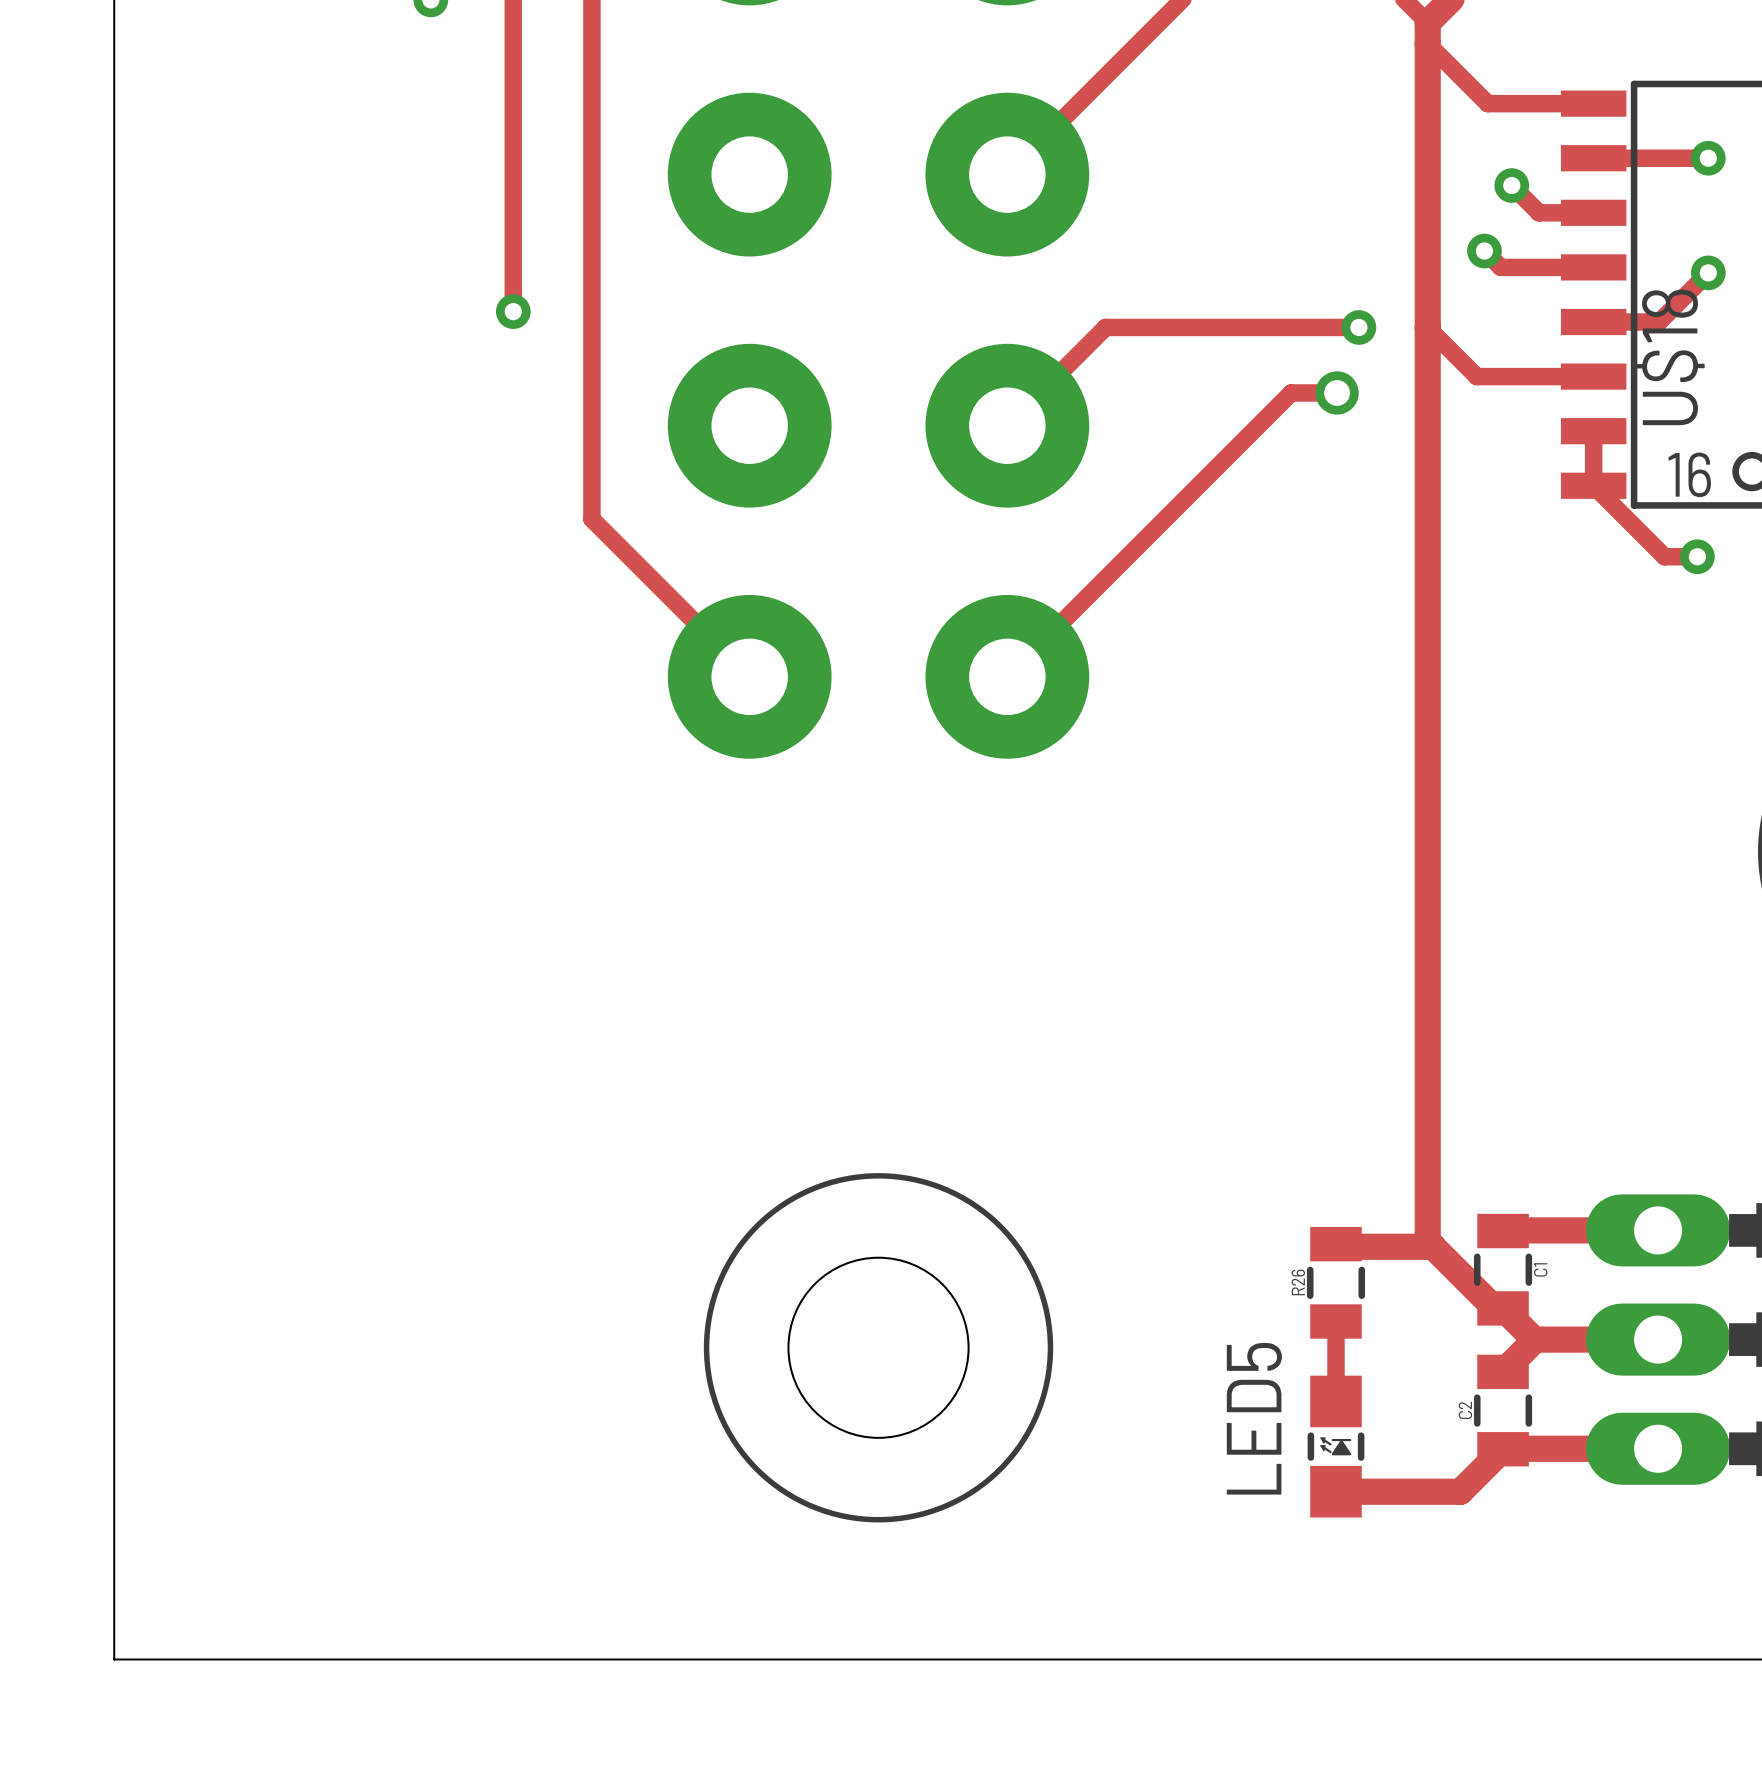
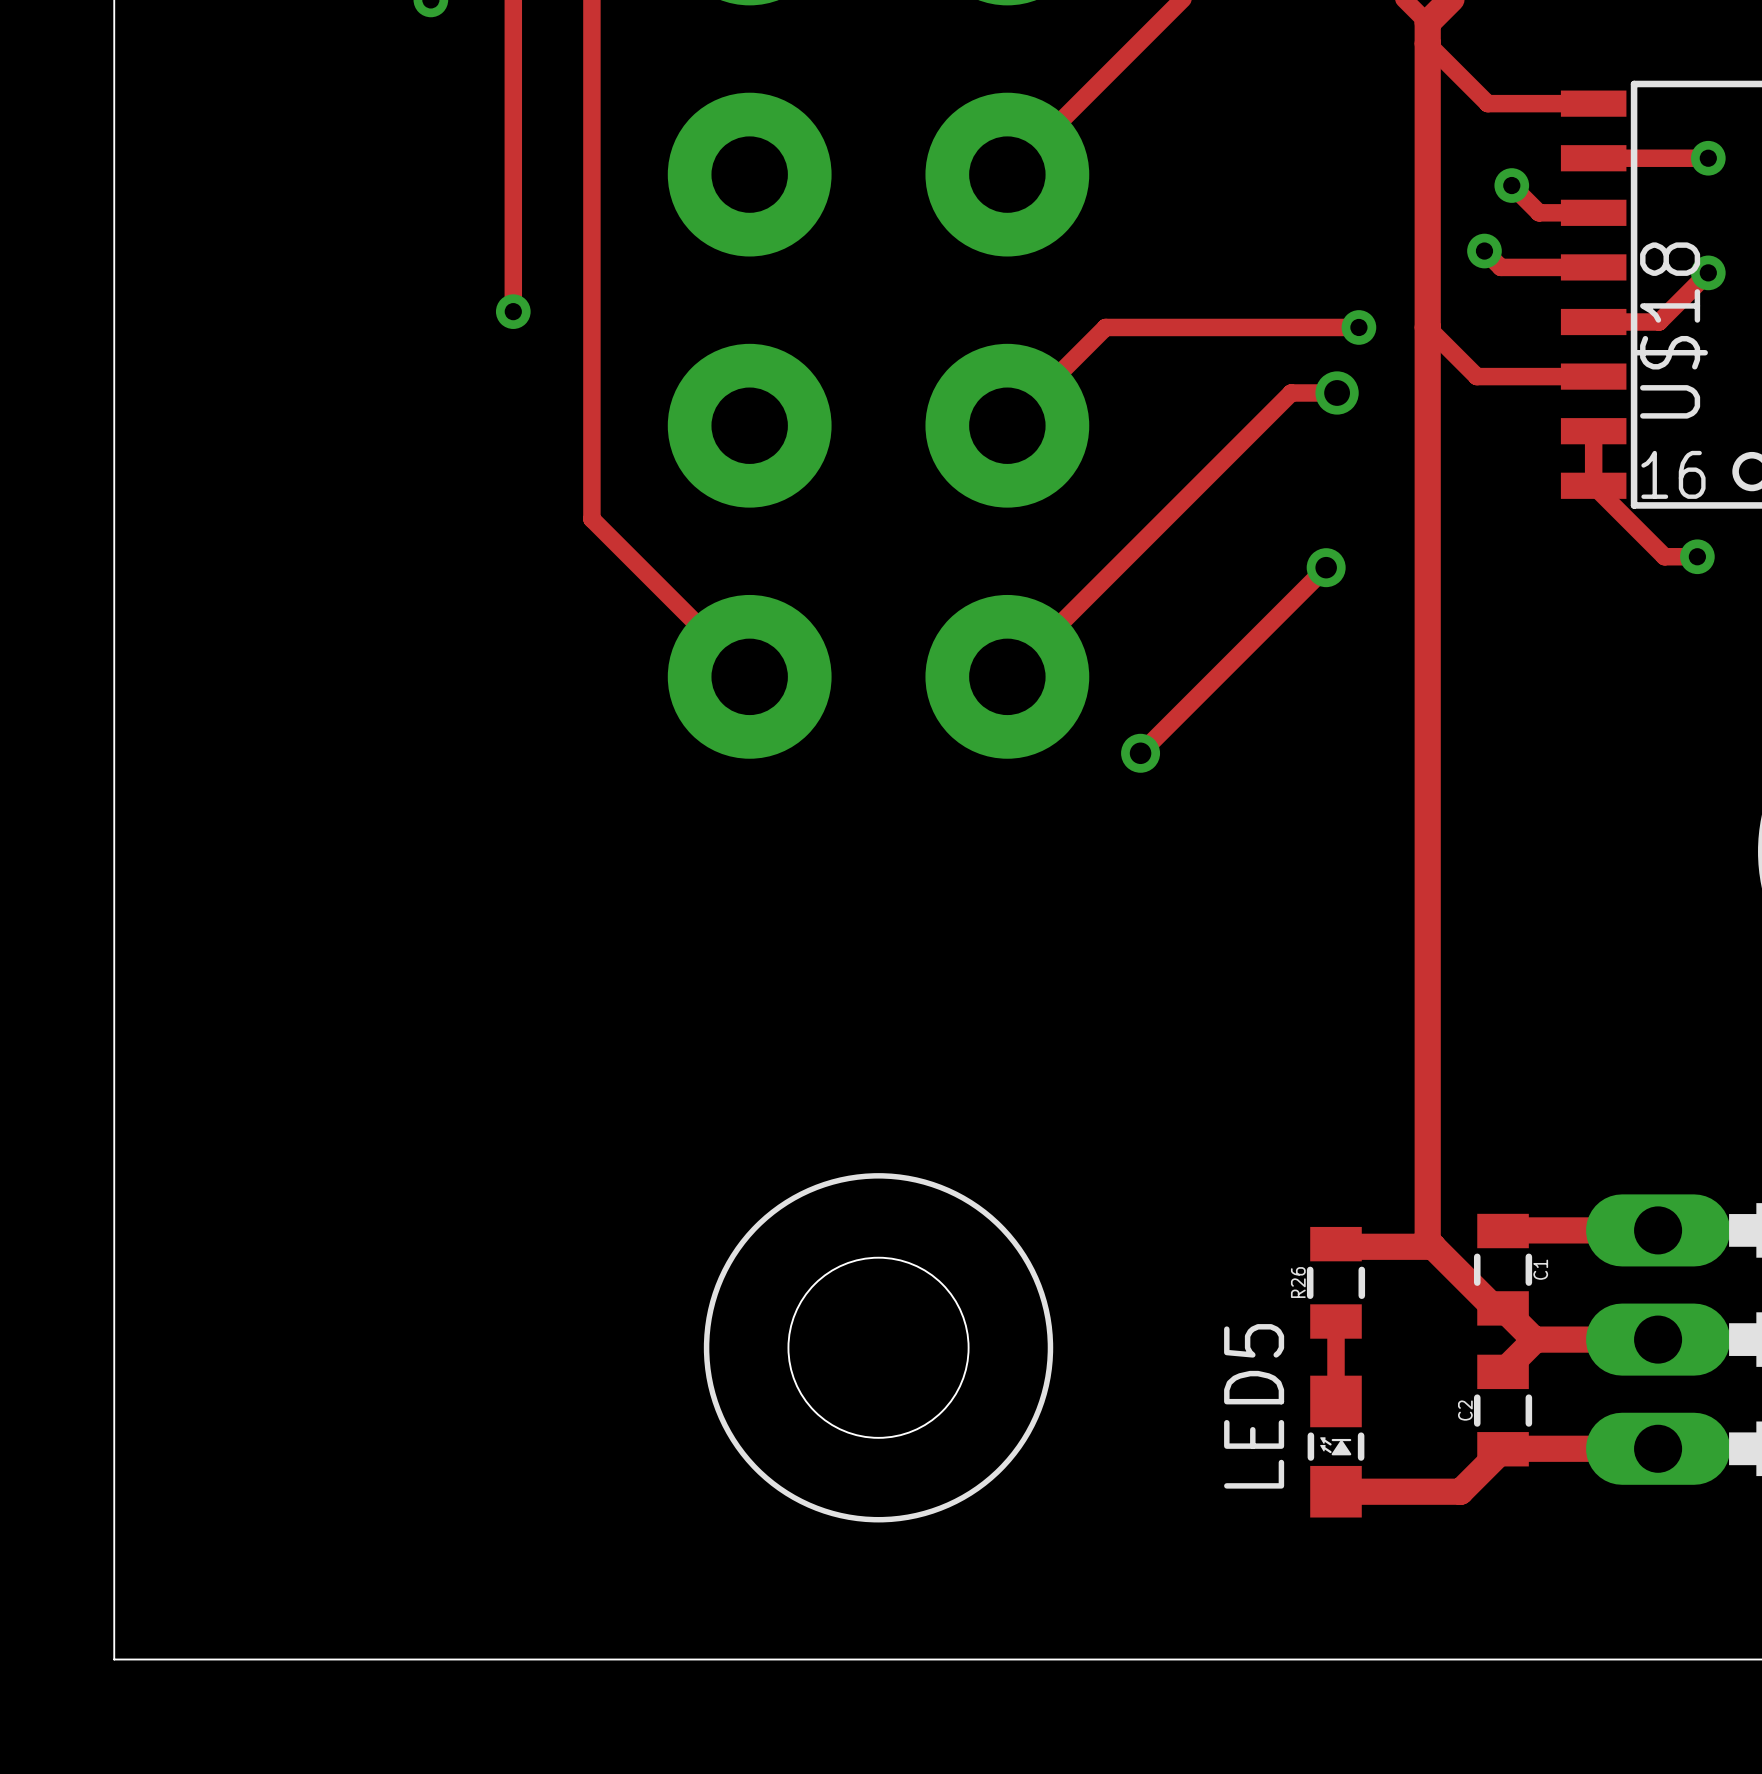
track: none -> (1326, 567) (1140, 753)
via: none -> (1326, 567)
via: none -> (1140, 753)

